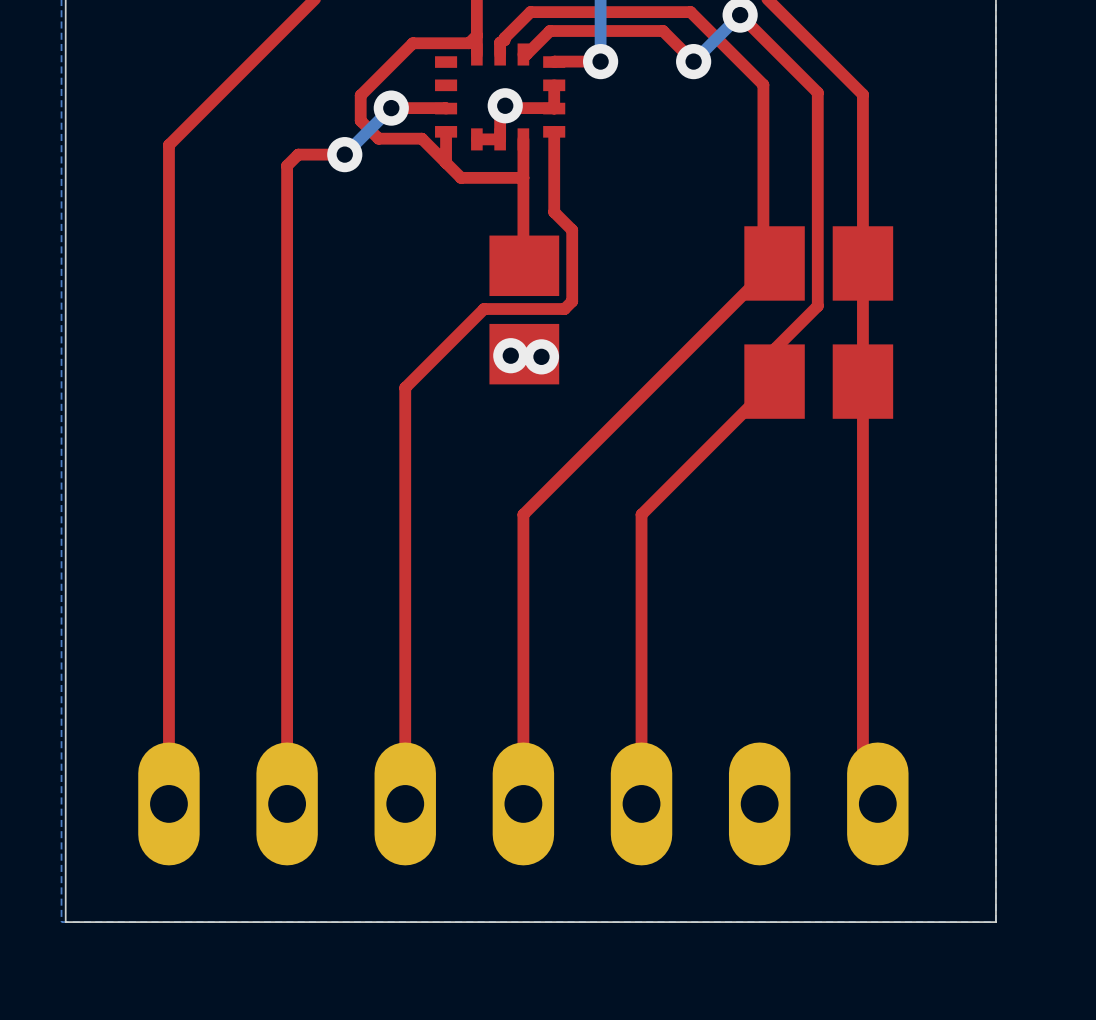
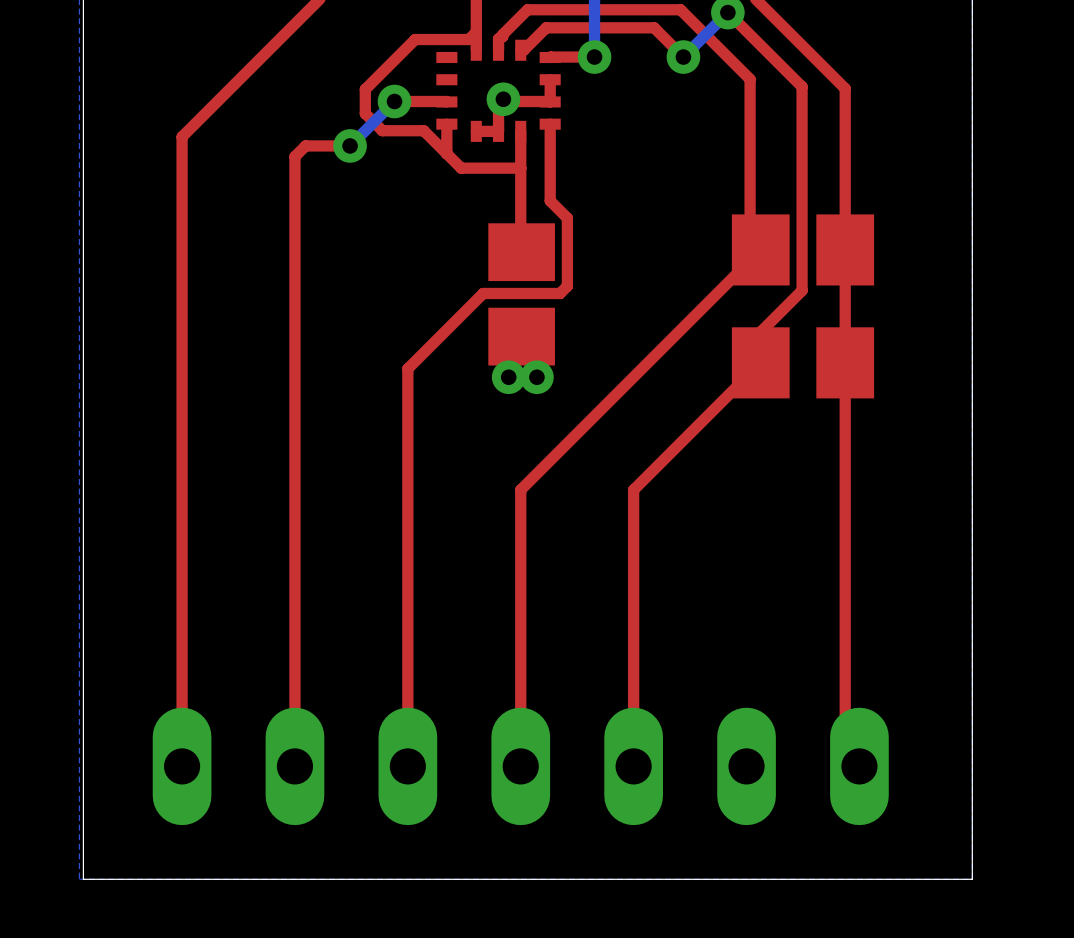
via: (510, 355) -> none
via: (541, 356) -> none
via: none -> (508, 377)
via: none -> (536, 377)

